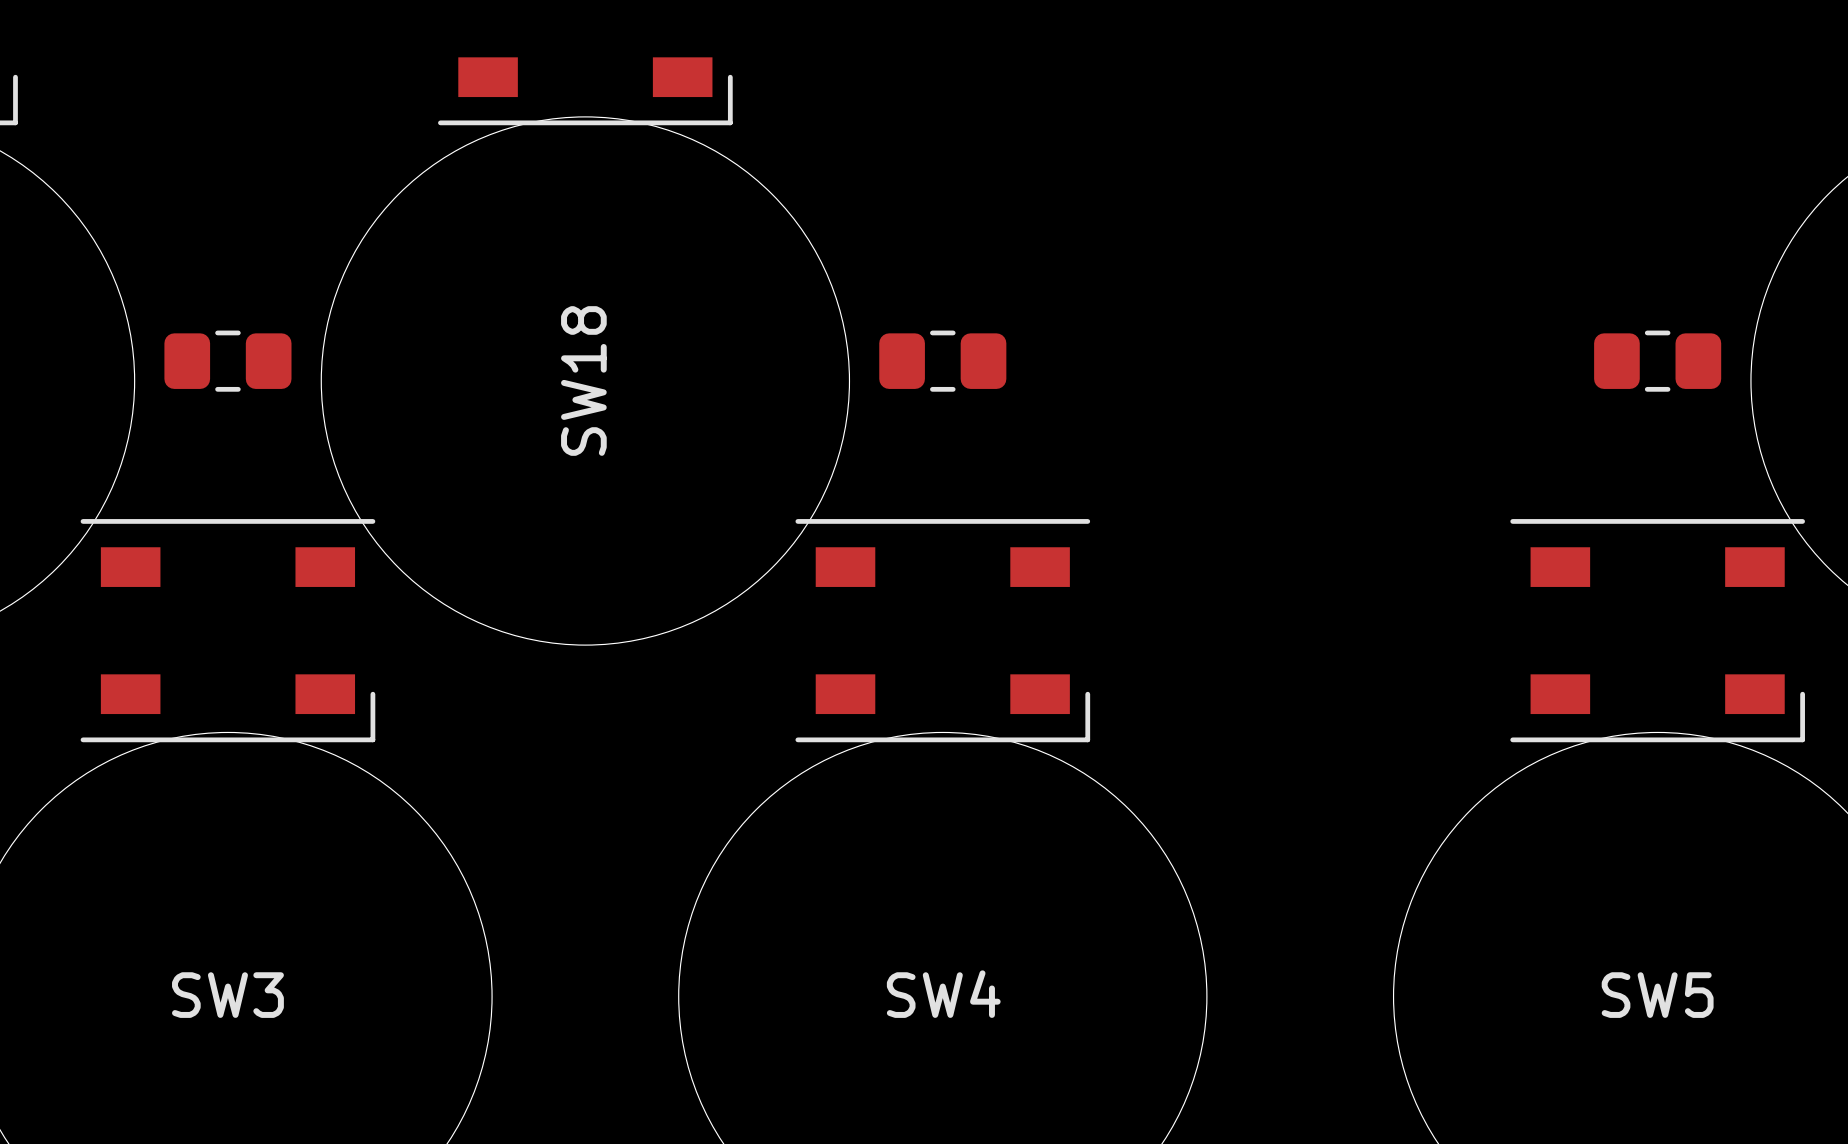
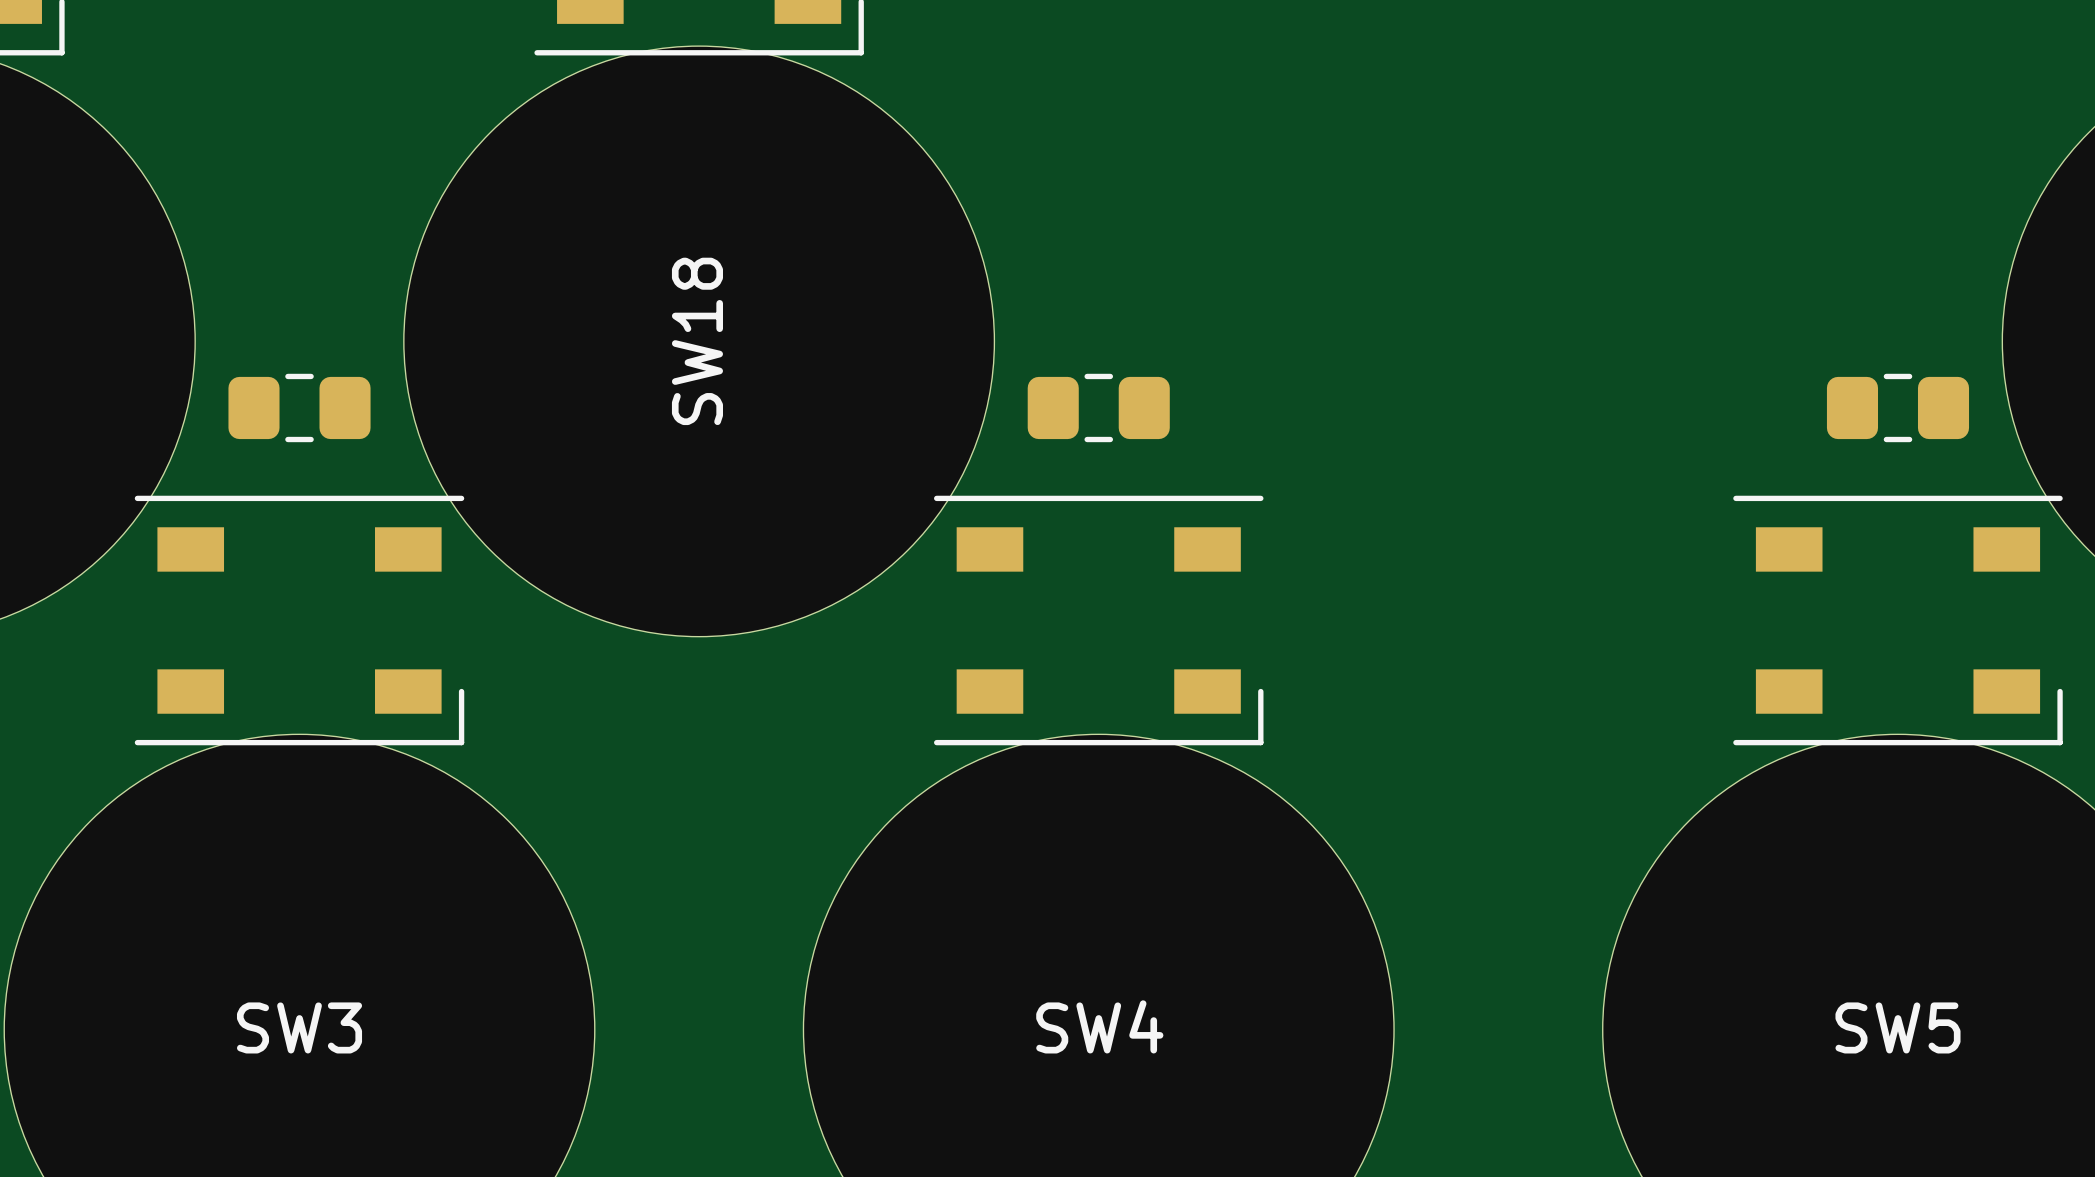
part position: (227, 361) -> (299, 407)
part position: (942, 361) -> (1098, 407)
part position: (1657, 361) -> (1897, 407)

